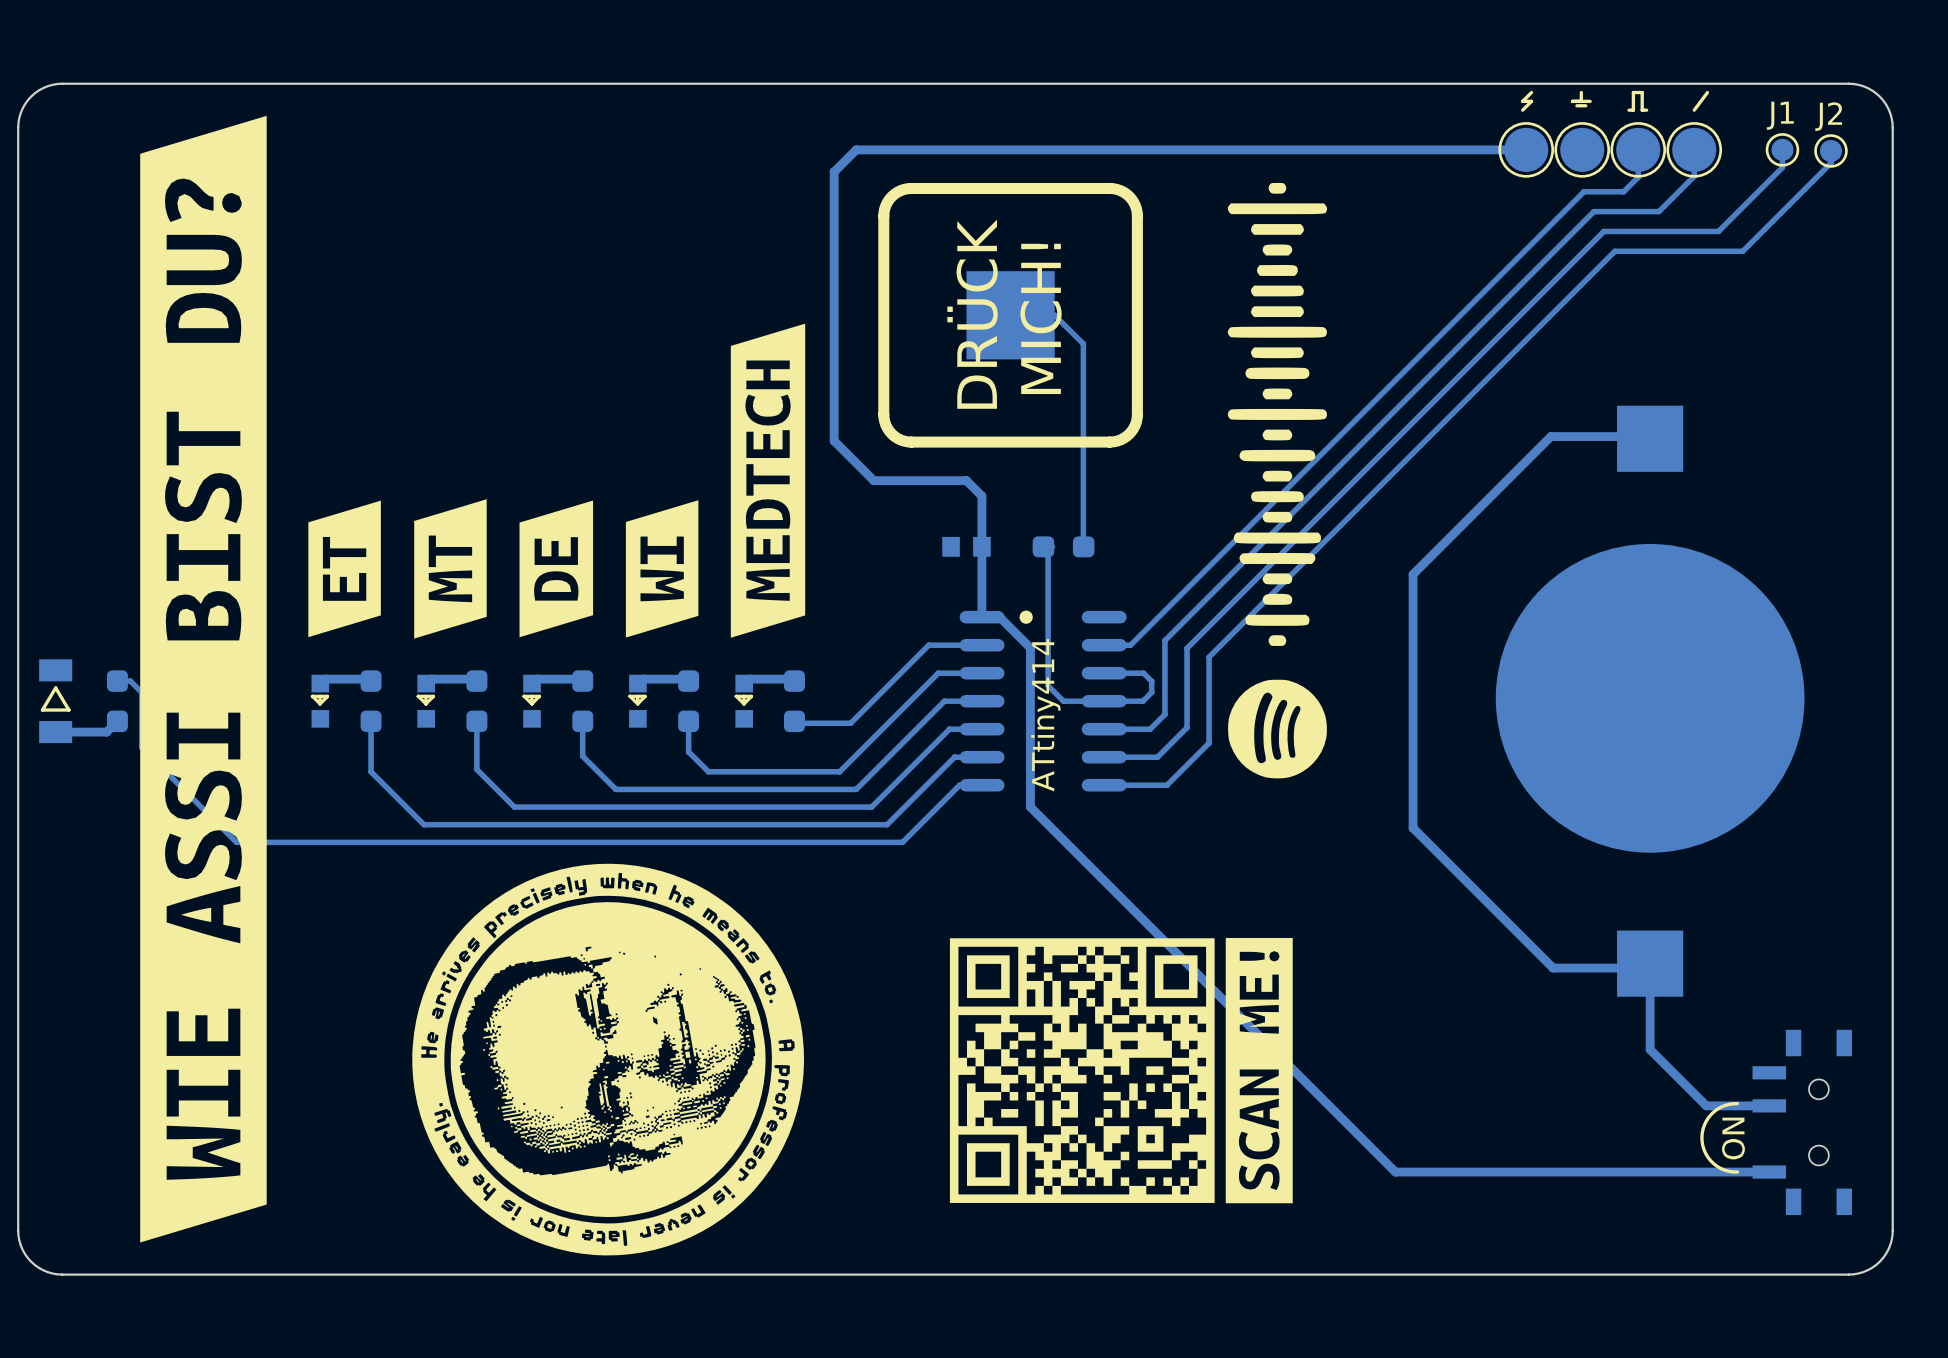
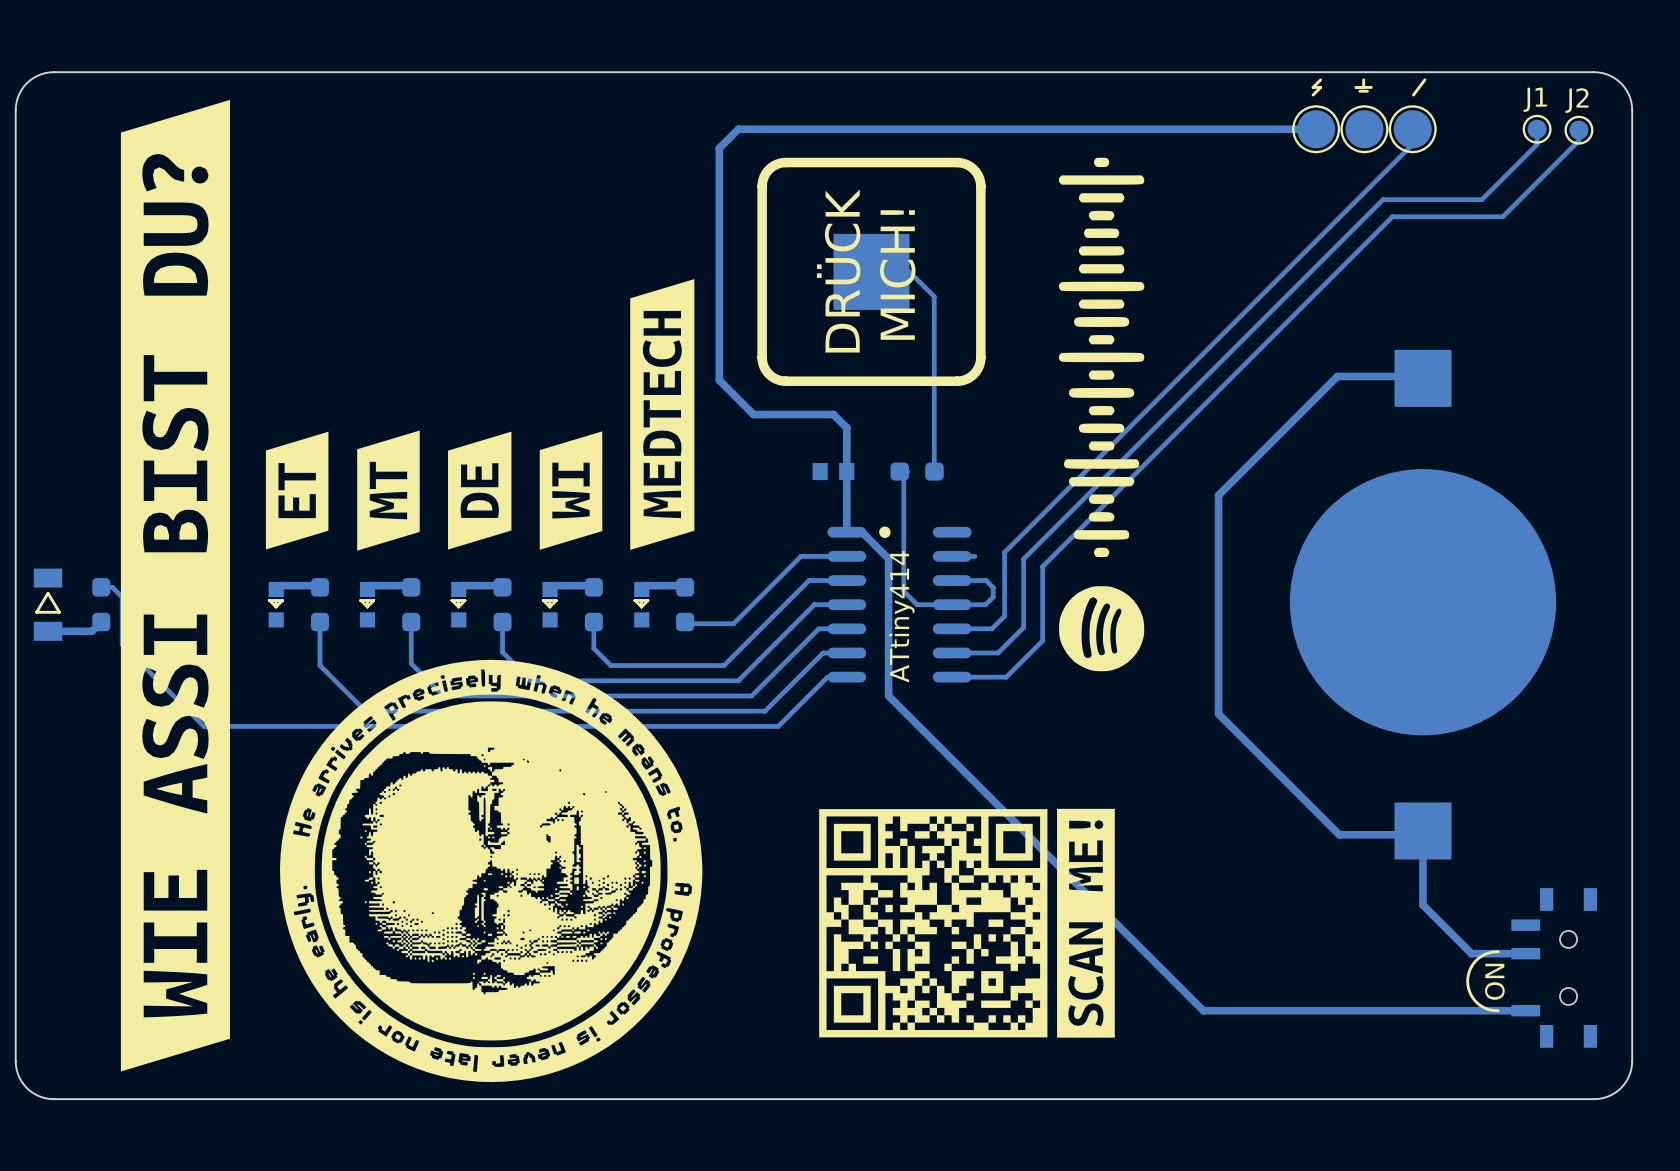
line: (1707, 92) (1694, 110) -> (1424, 79) (1413, 95)
line: (1646, 110) (1642, 110) (1642, 92) (1633, 92) (1633, 110) (1628, 110) -> none
track: (1694, 149) (1694, 176) (1658, 211) (1593, 211) -> (1412, 144) (1374, 182)
part: (1694, 149) -> none
track: (1638, 167) (1638, 177) (1623, 191) (1583, 191) (1130, 645) -> none
drawing: none -> [279, 659, 703, 1083]
drawing: [412, 863, 805, 1256] -> none

